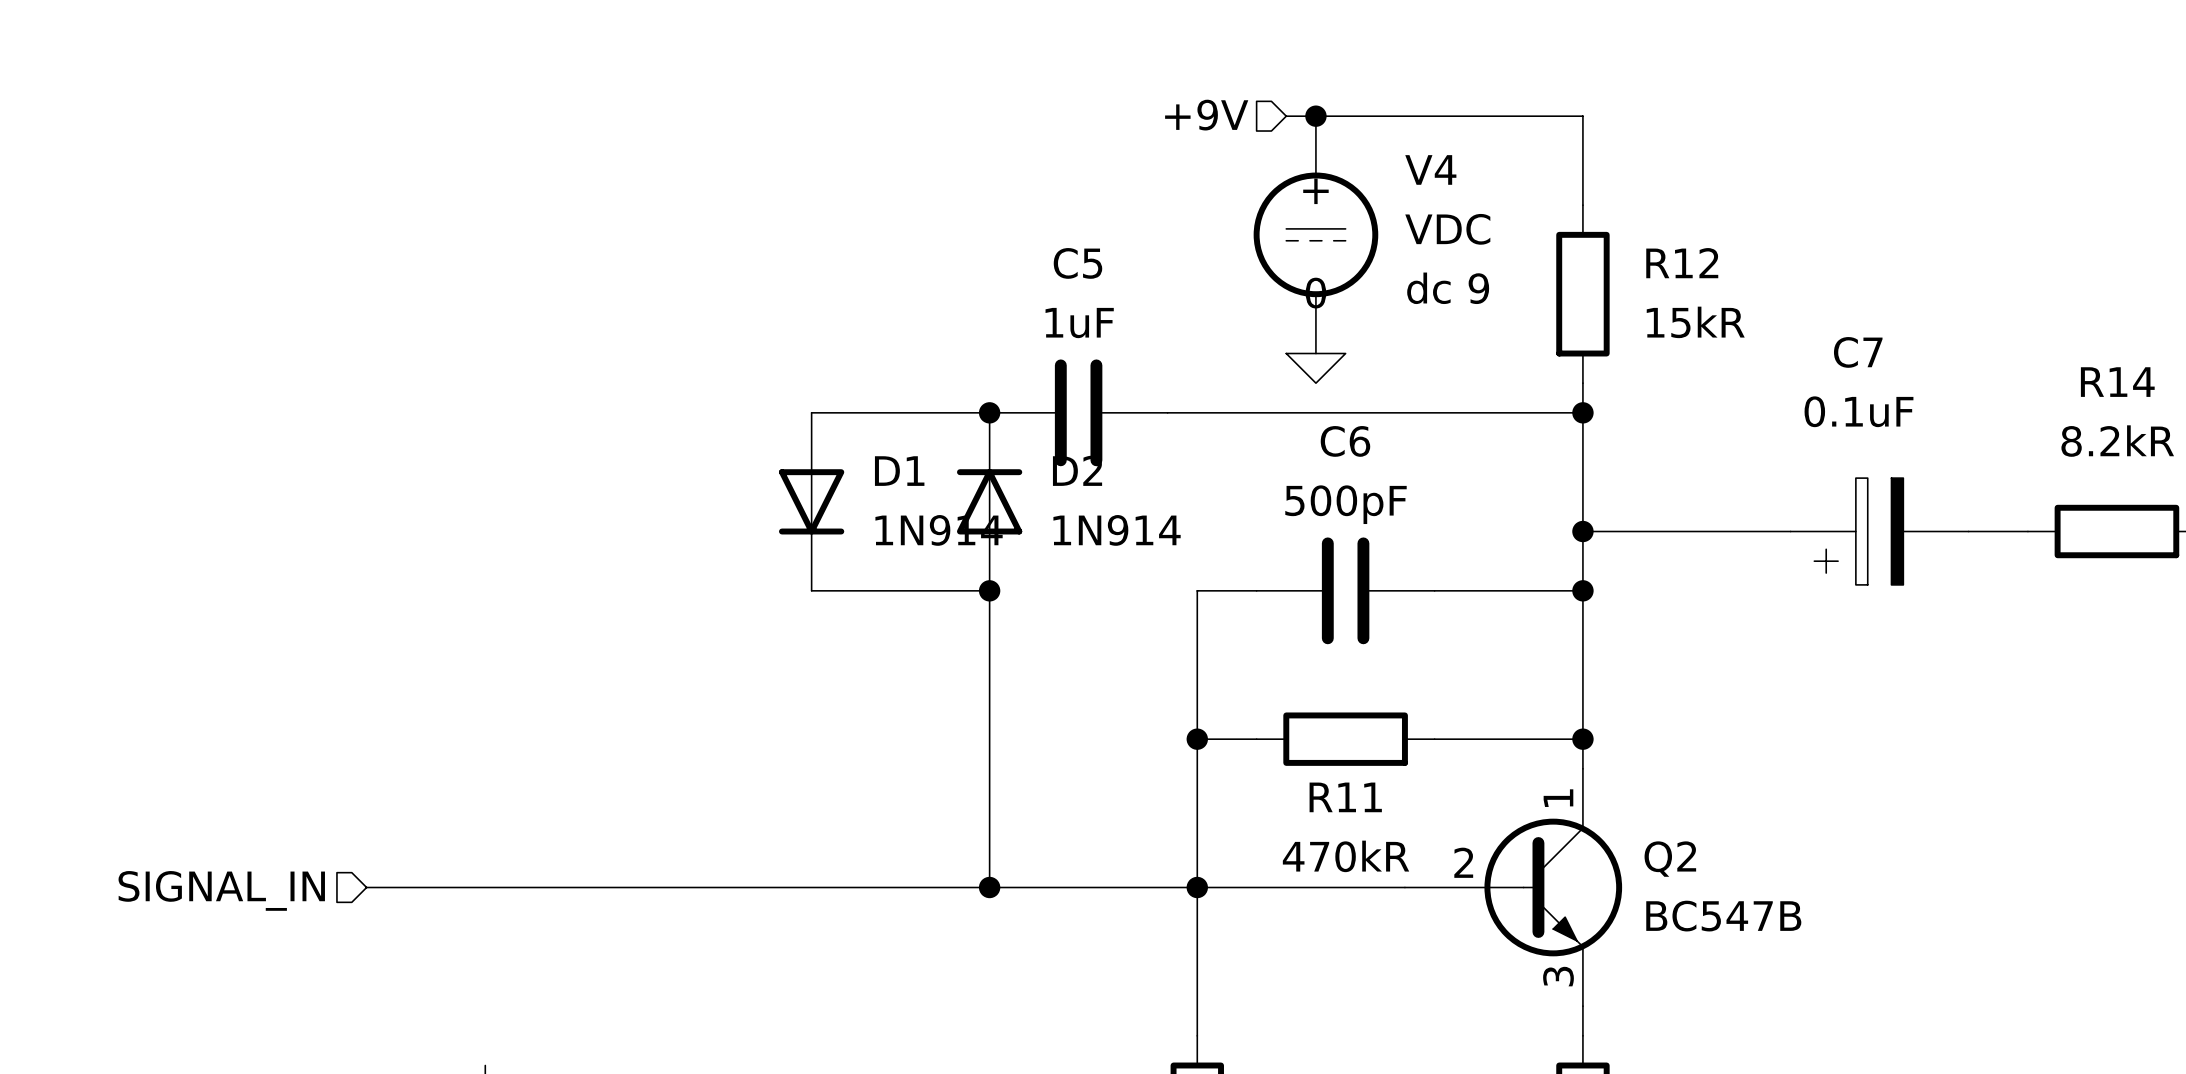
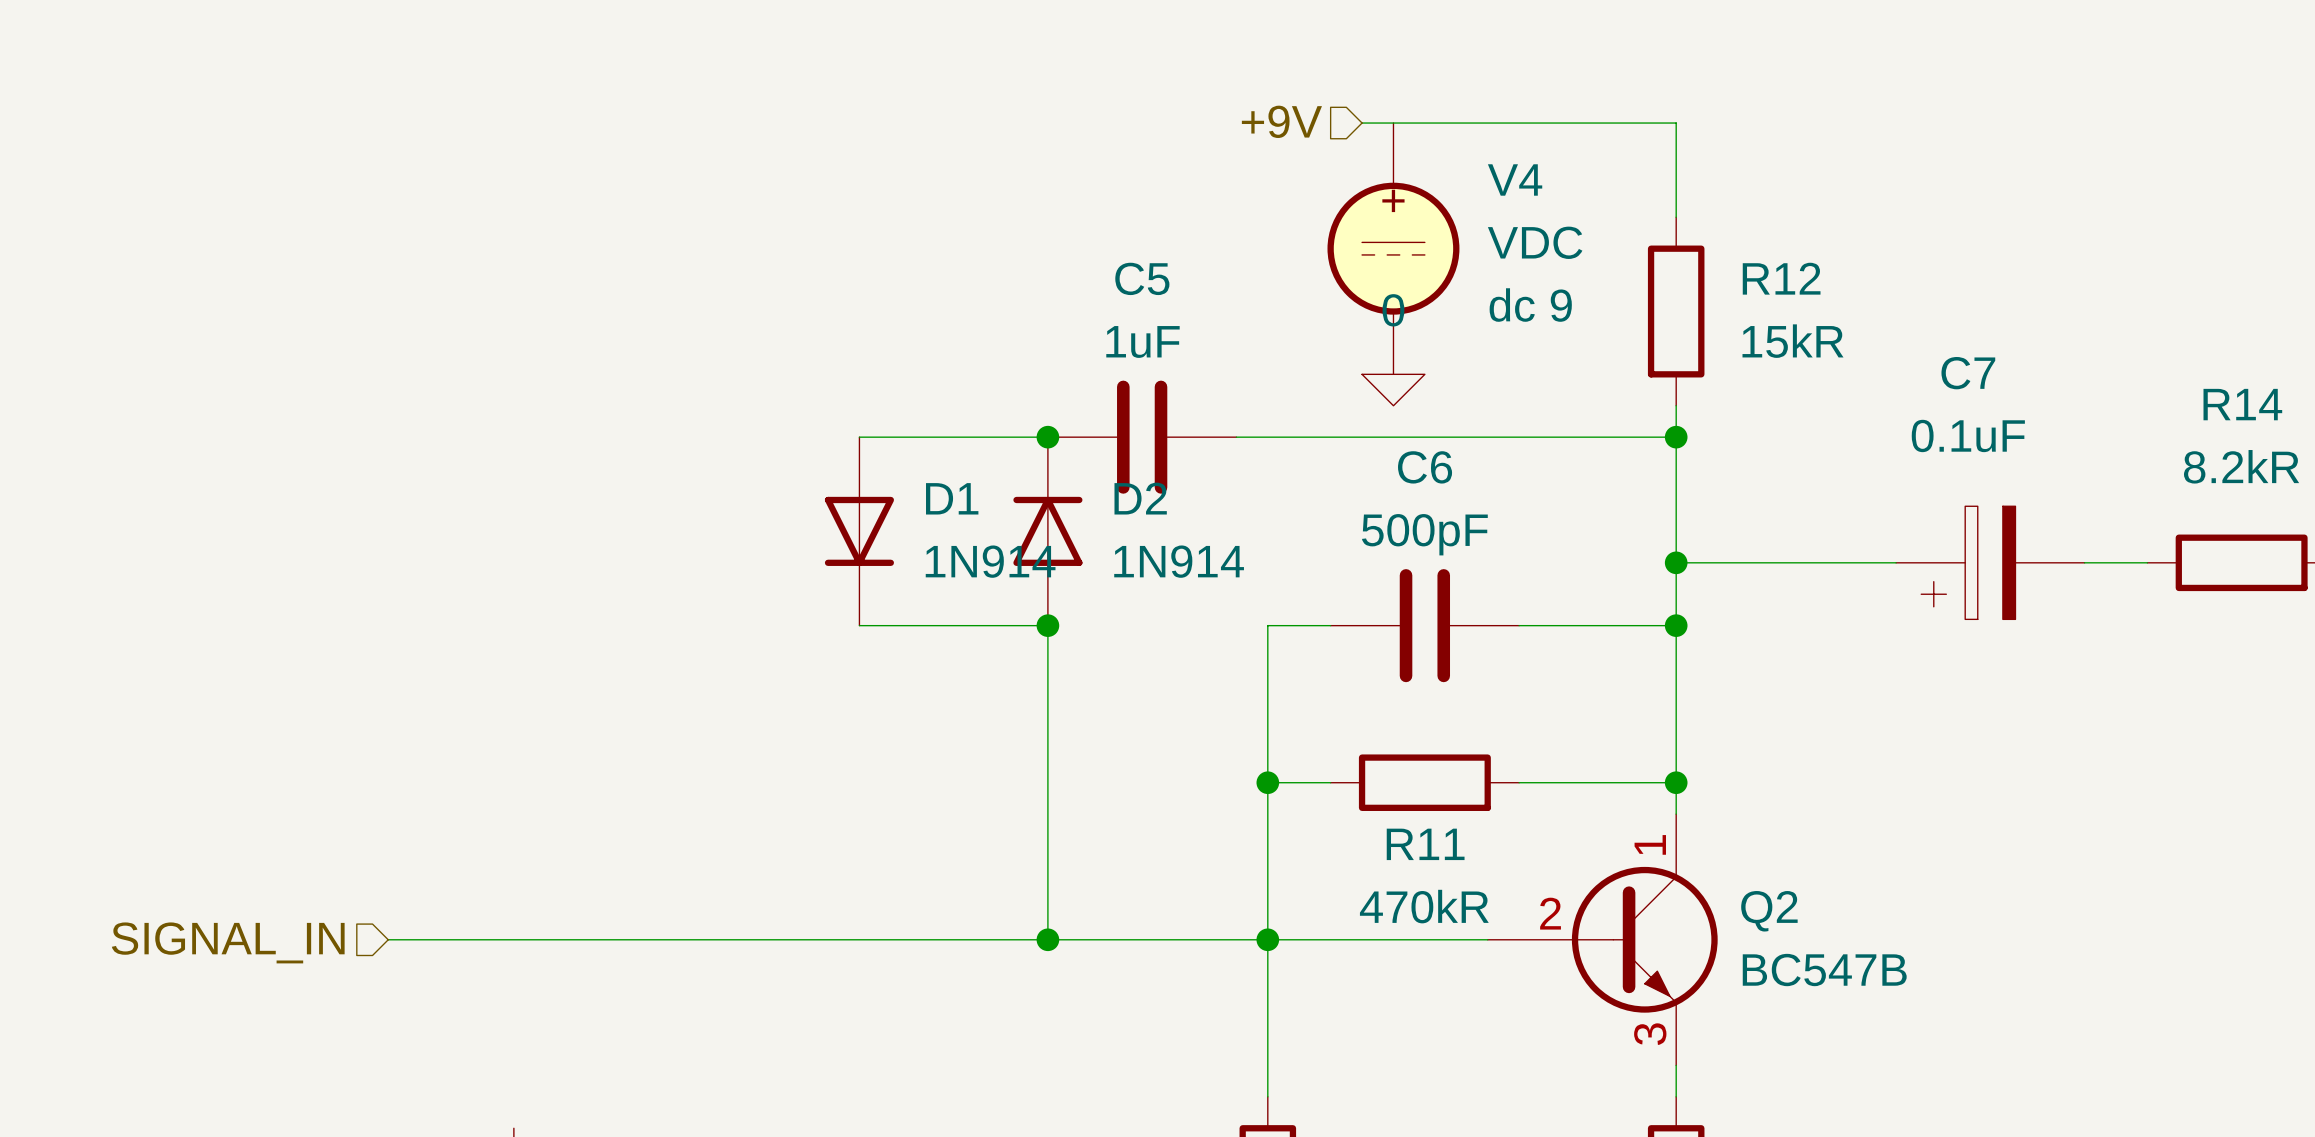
junction: (1315, 116) -> none

